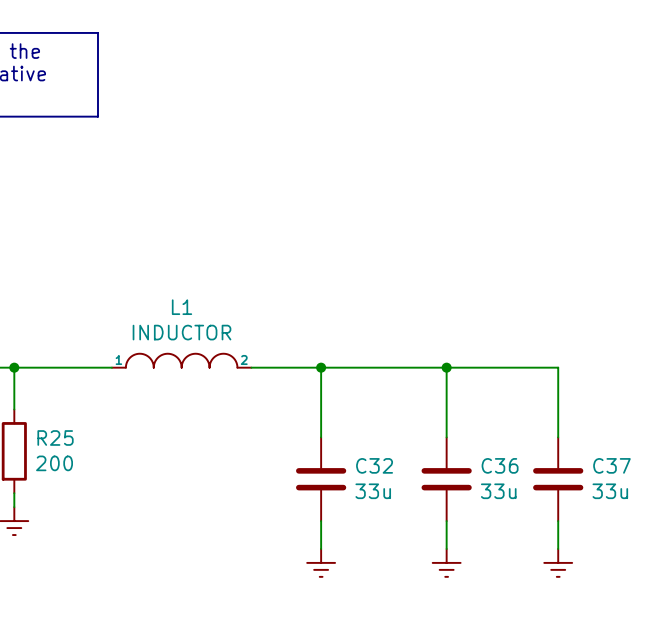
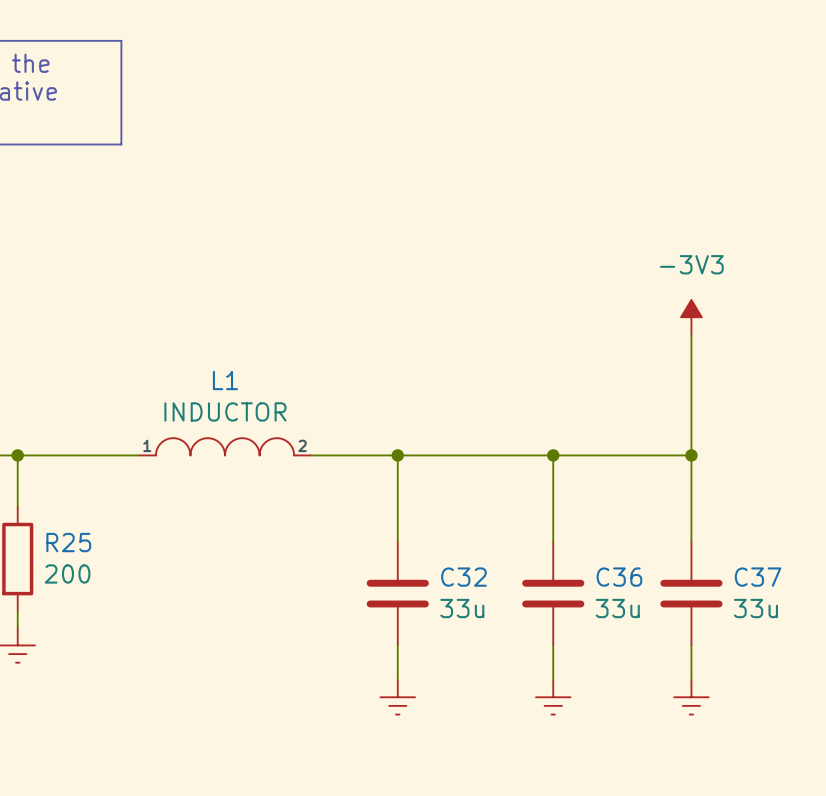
power symbol: none -> -3V3 (691, 317)
wire: none -> (691, 334) (691, 455)
junction: none -> (691, 455)

